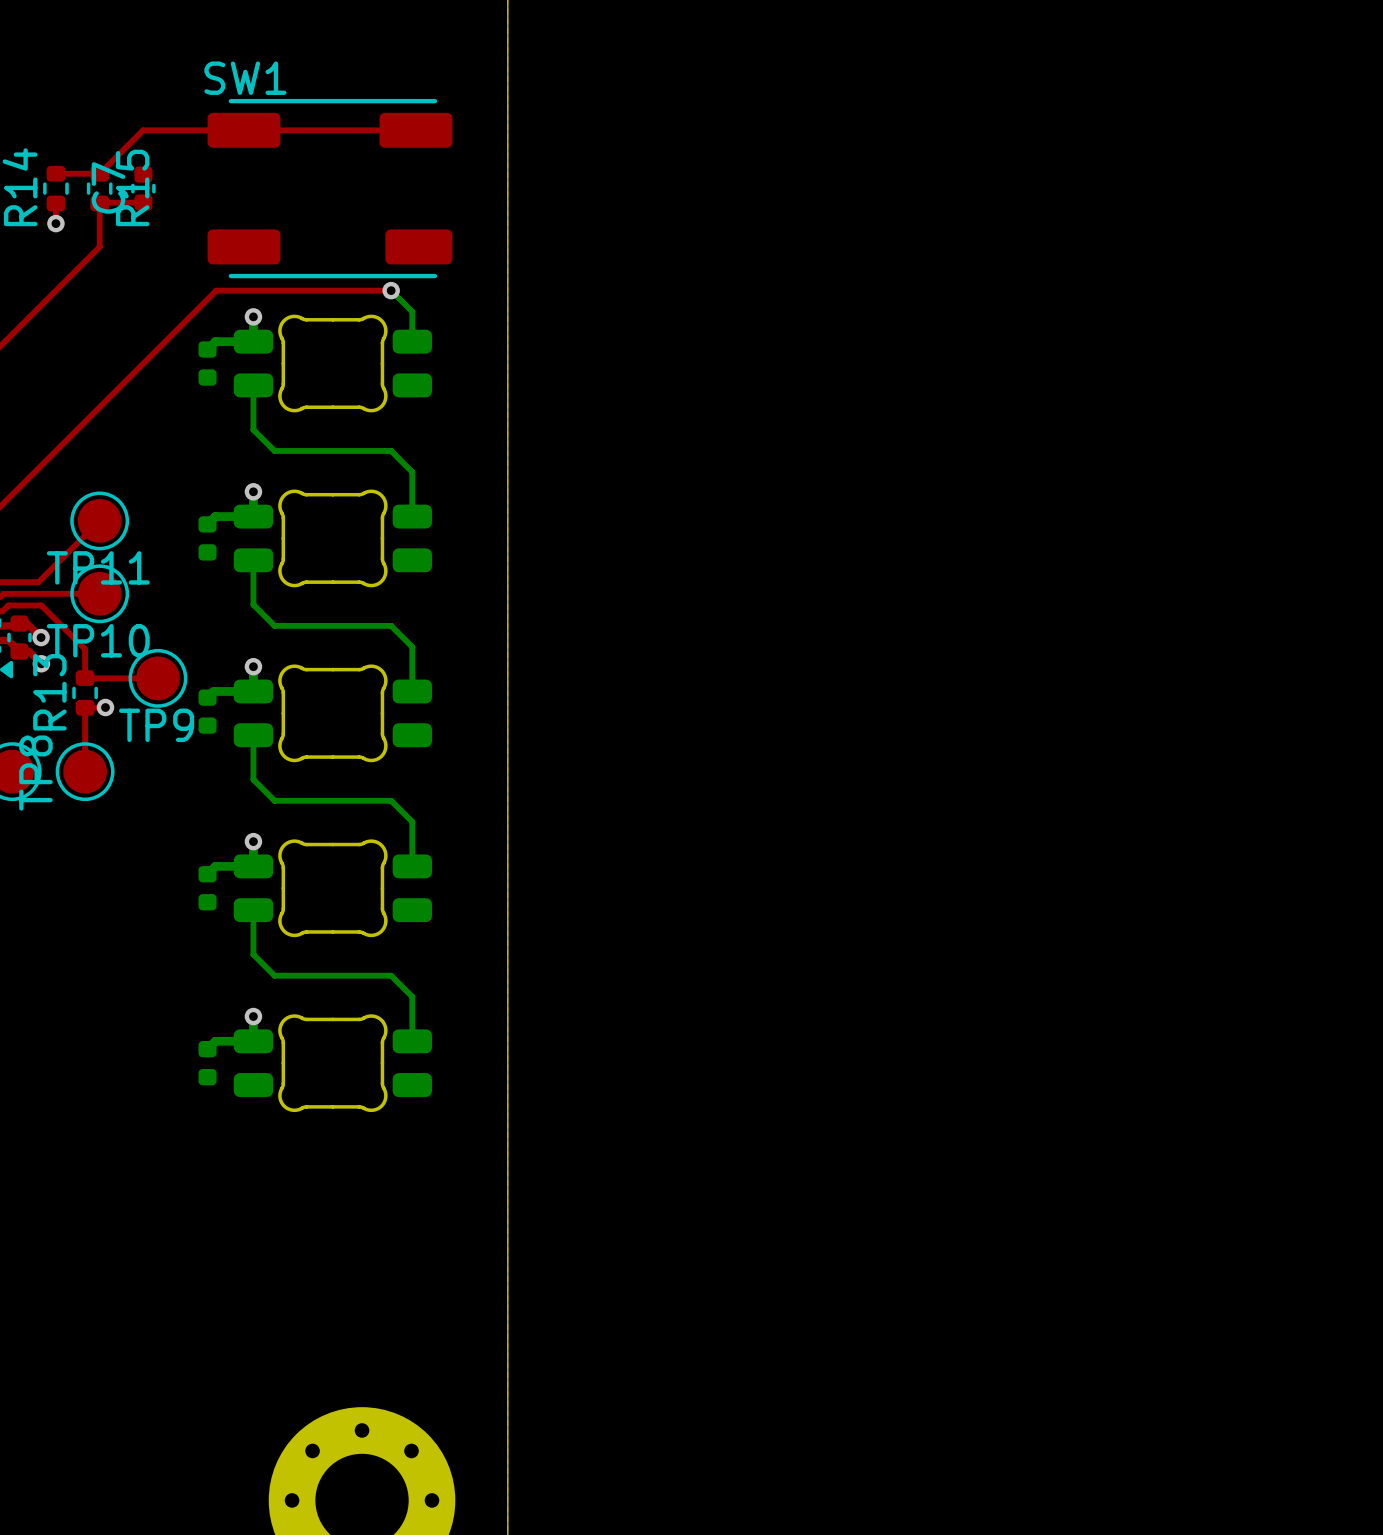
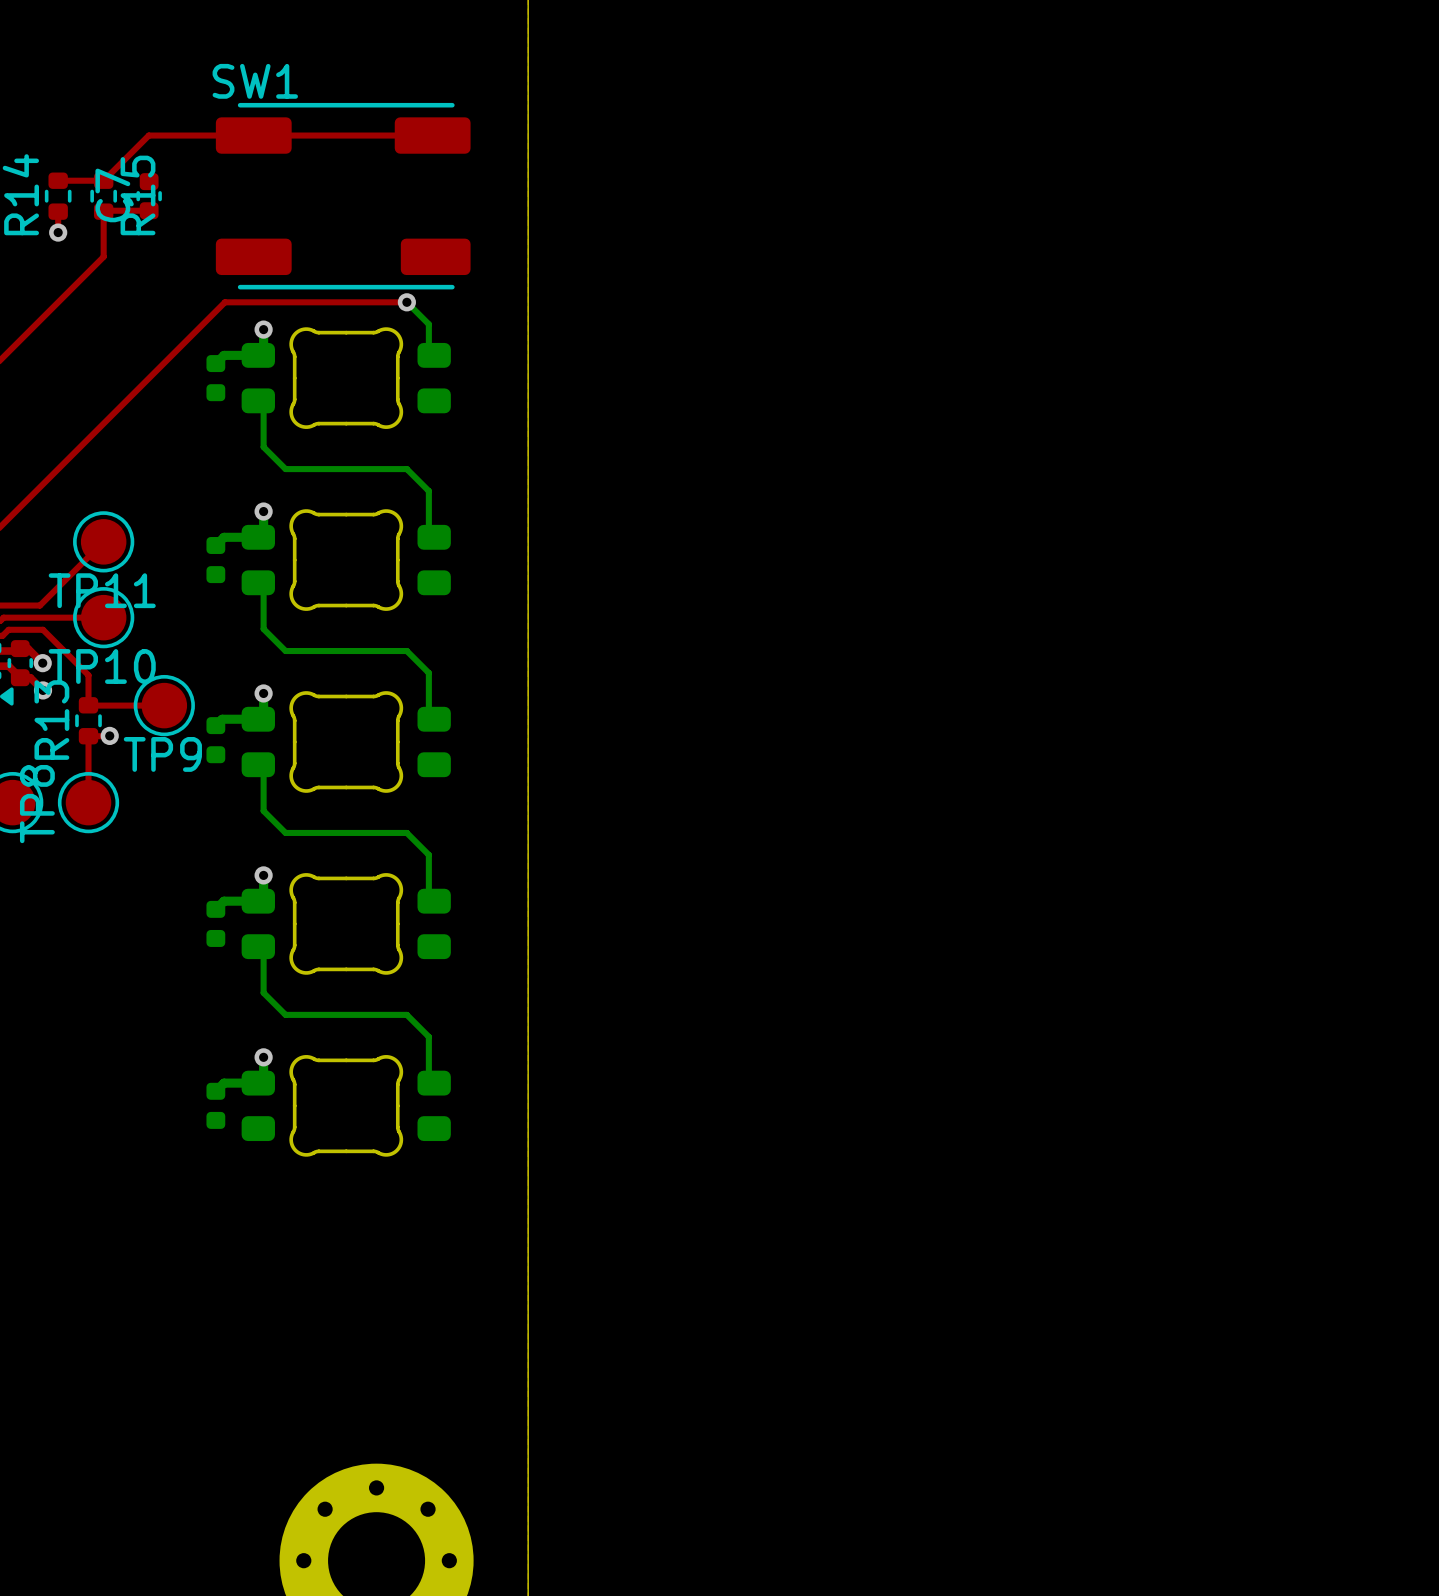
part footprint: [233, 314, 432, 413] -> [241, 327, 451, 429]
part footprint: [233, 489, 432, 588] -> [241, 509, 451, 611]
part footprint: [233, 664, 432, 763] -> [241, 691, 451, 793]
part footprint: [233, 839, 432, 938] -> [241, 873, 451, 975]
part footprint: [233, 1014, 432, 1113] -> [241, 1055, 451, 1157]

